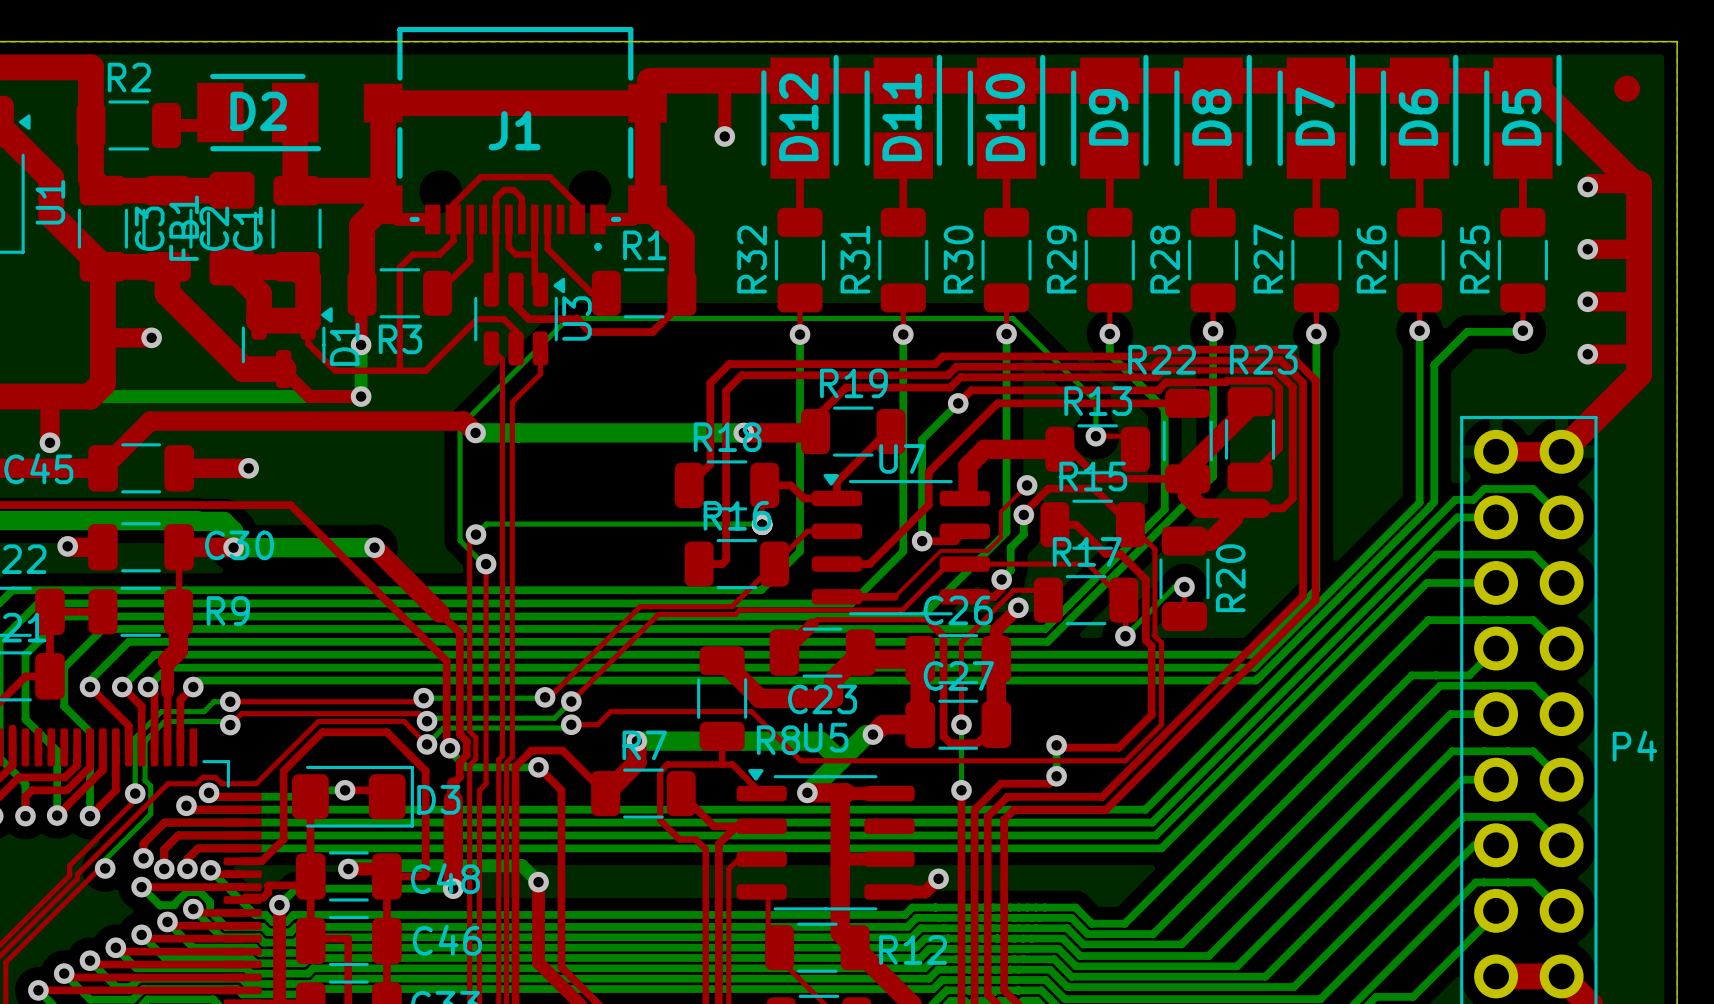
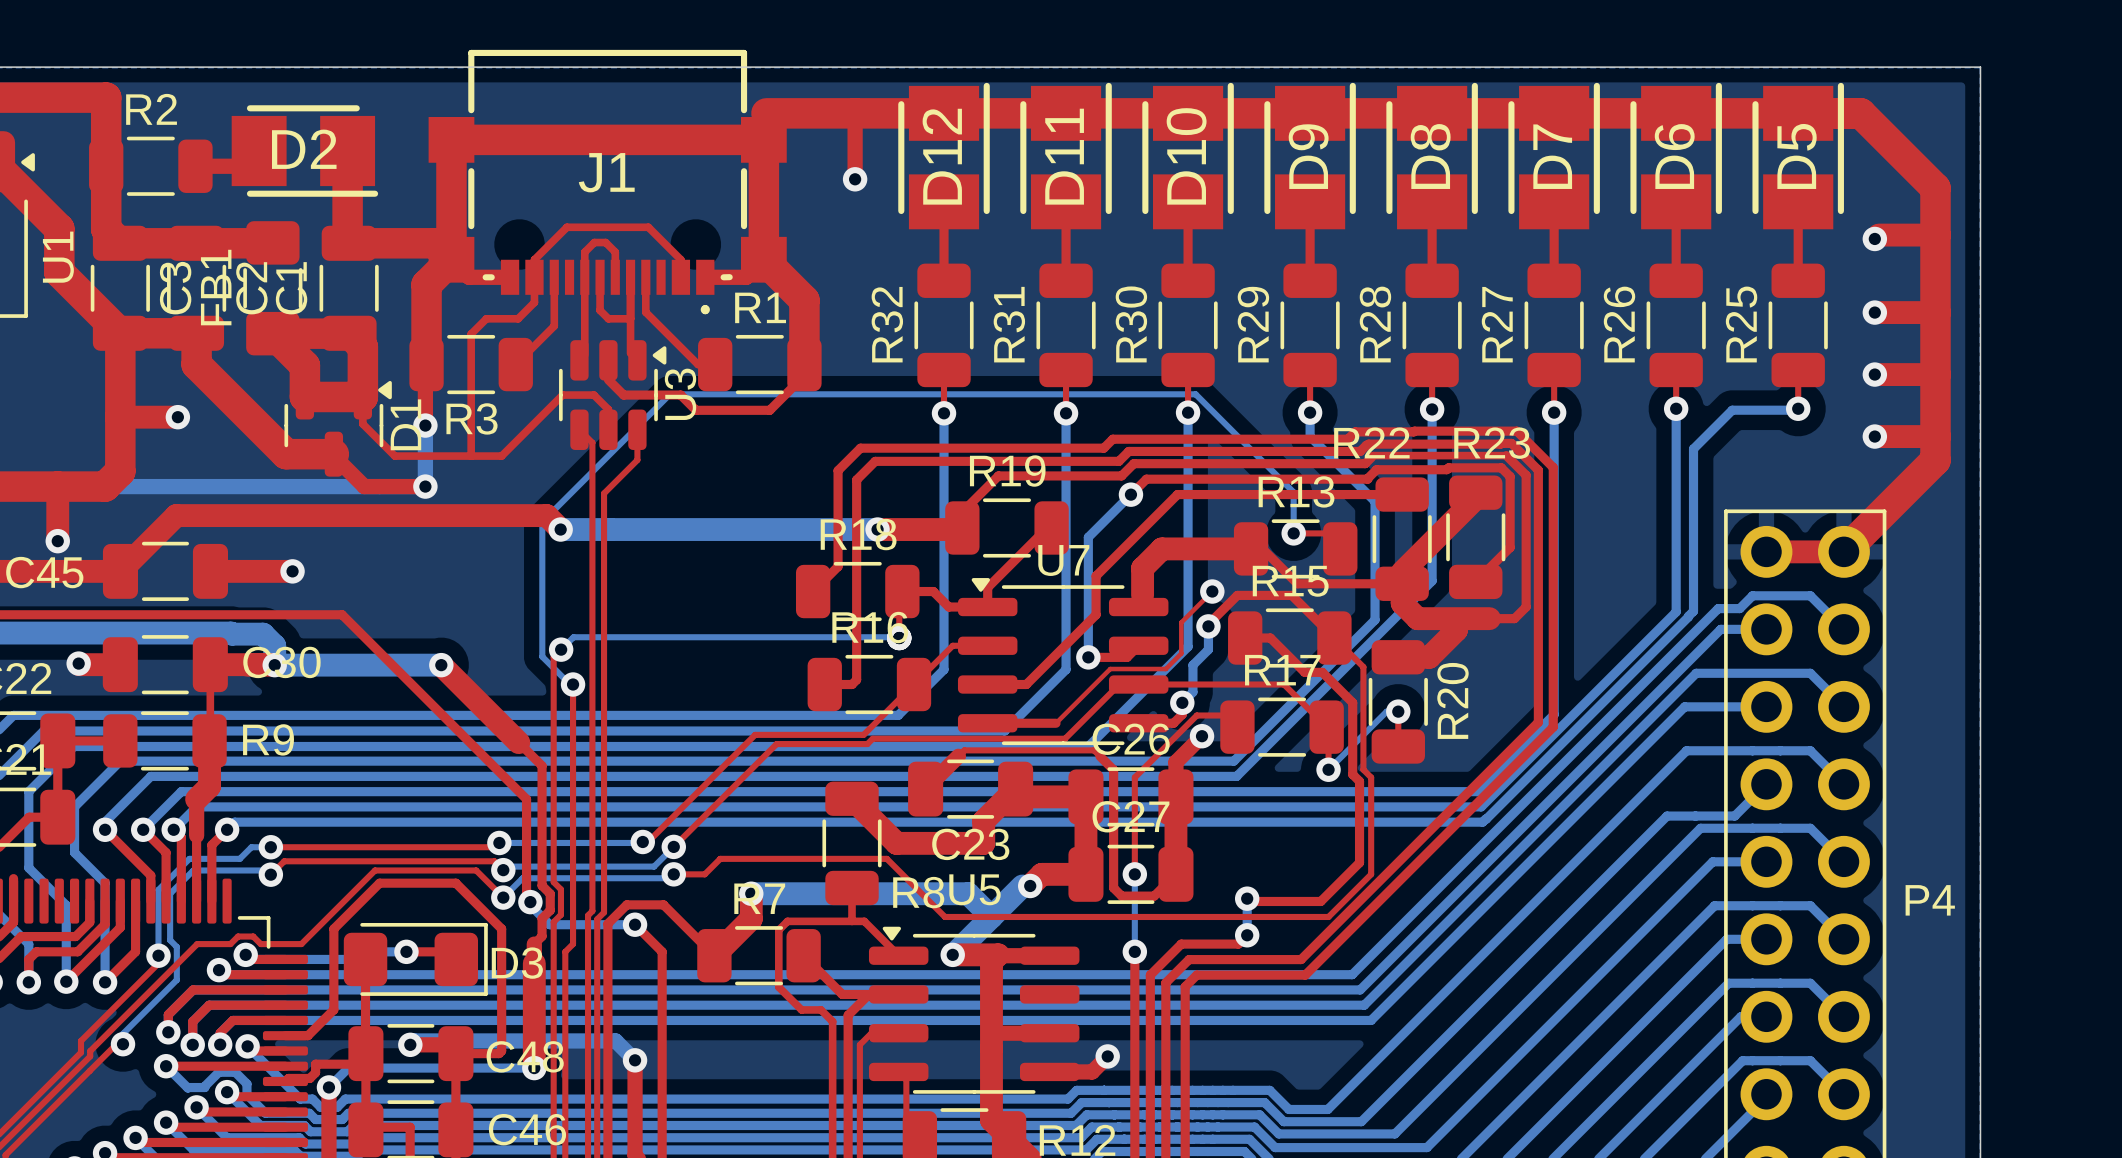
top track: (1530, 80) (1633, 183) (1639, 183) -> (1807, 113) (1860, 113) (1935, 188) (1935, 235)
part: (1627, 88) -> none

